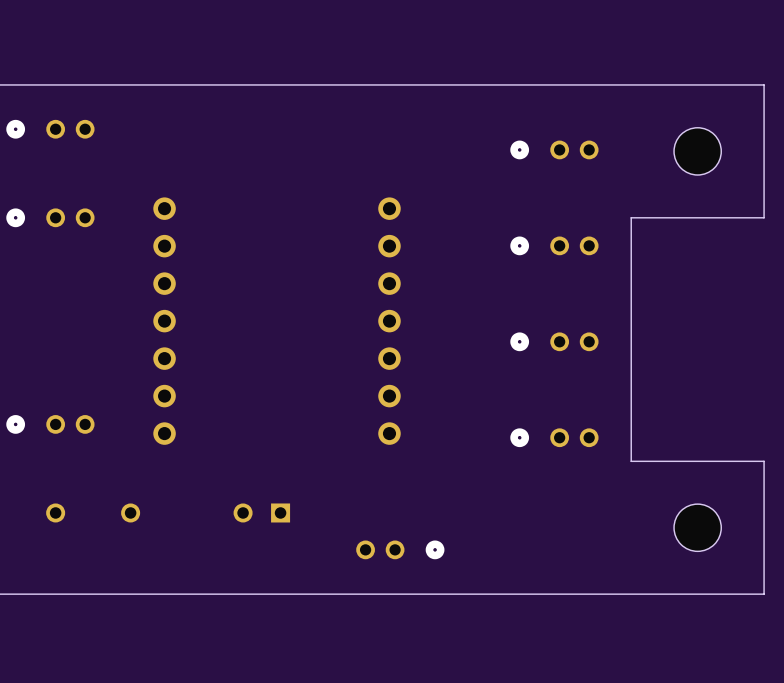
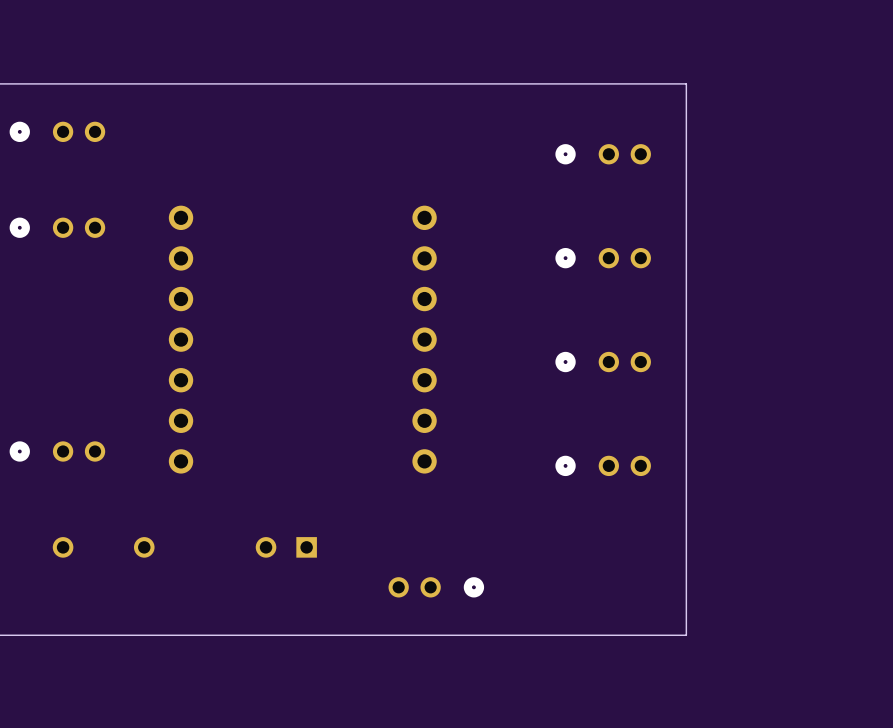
board edge: (631, 84) (764, 84) (764, 217) (631, 217) -> (686, 83) (686, 227)
part: (697, 151) -> none
board edge: (631, 461) (764, 461) (764, 594) (631, 594) -> (686, 491) (686, 635)
part: (697, 527) -> none

